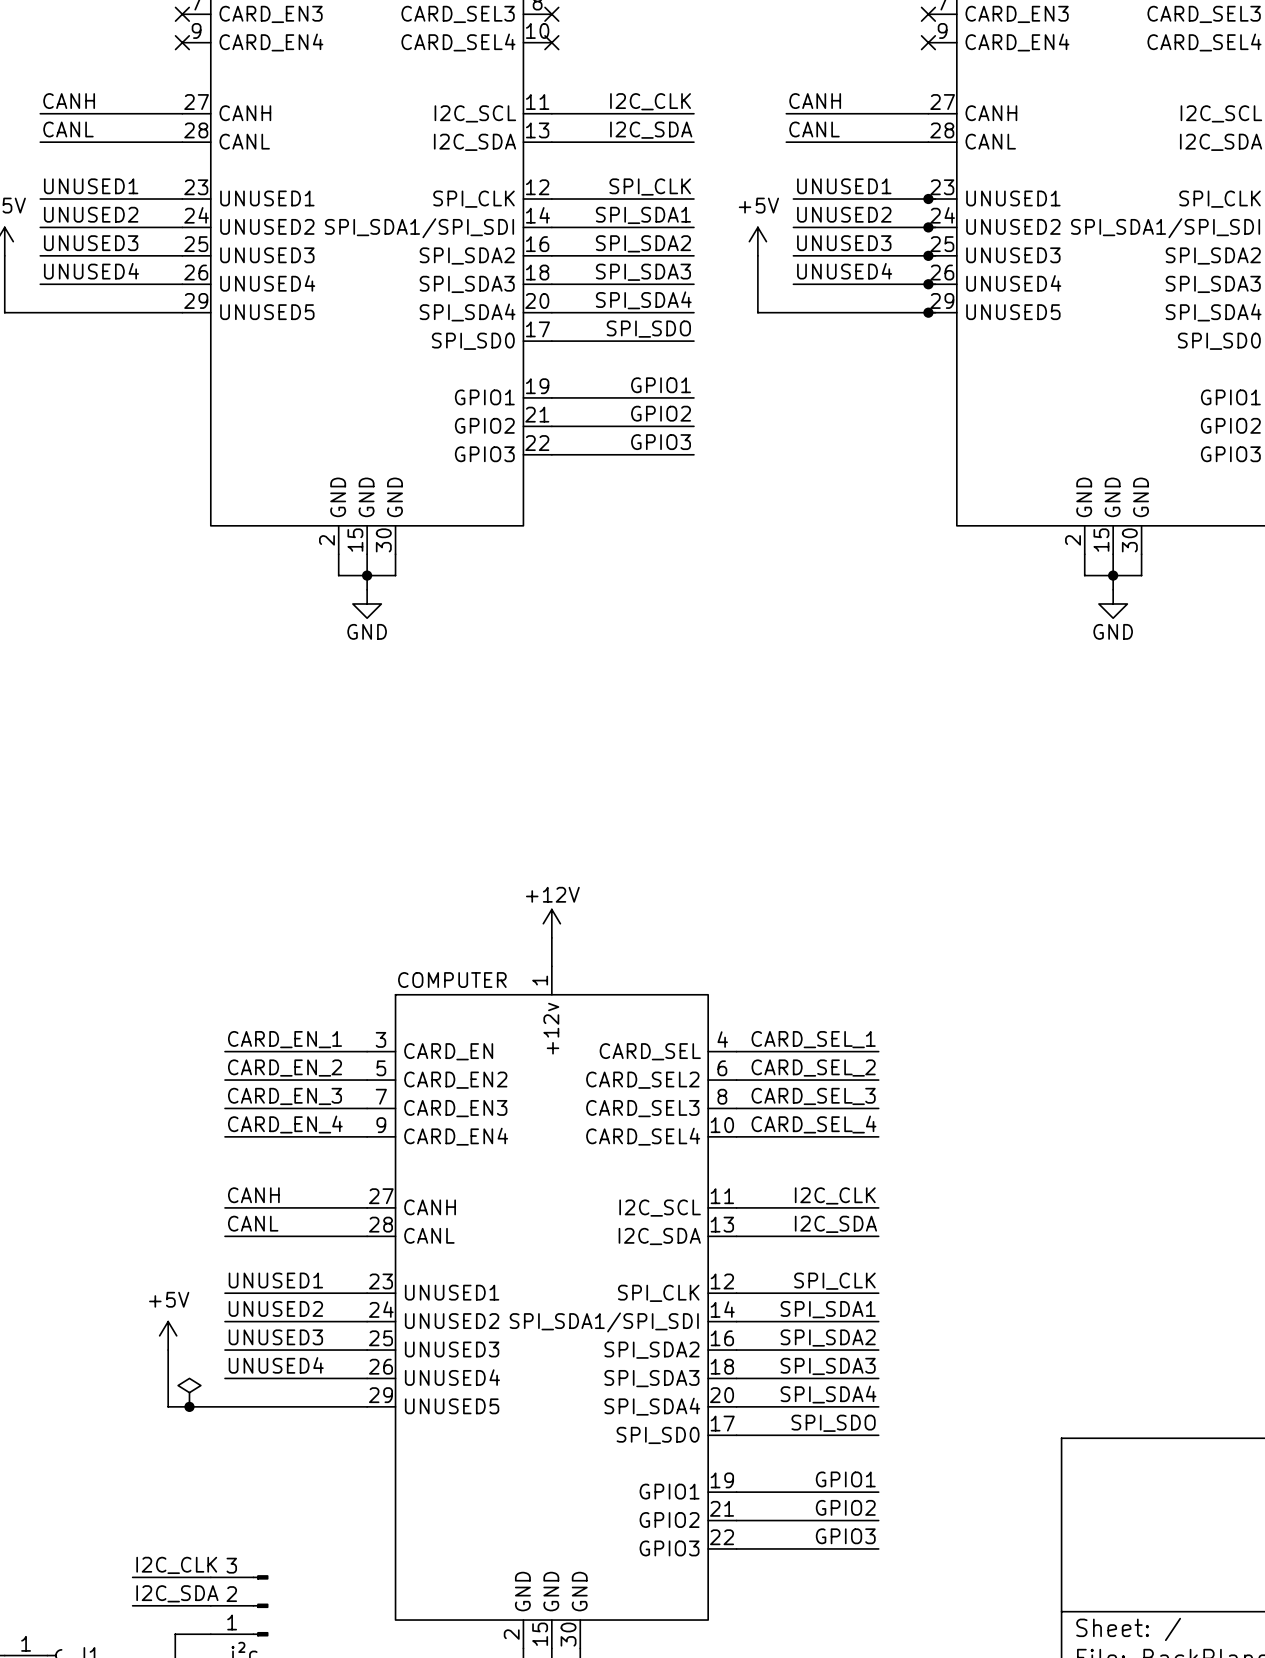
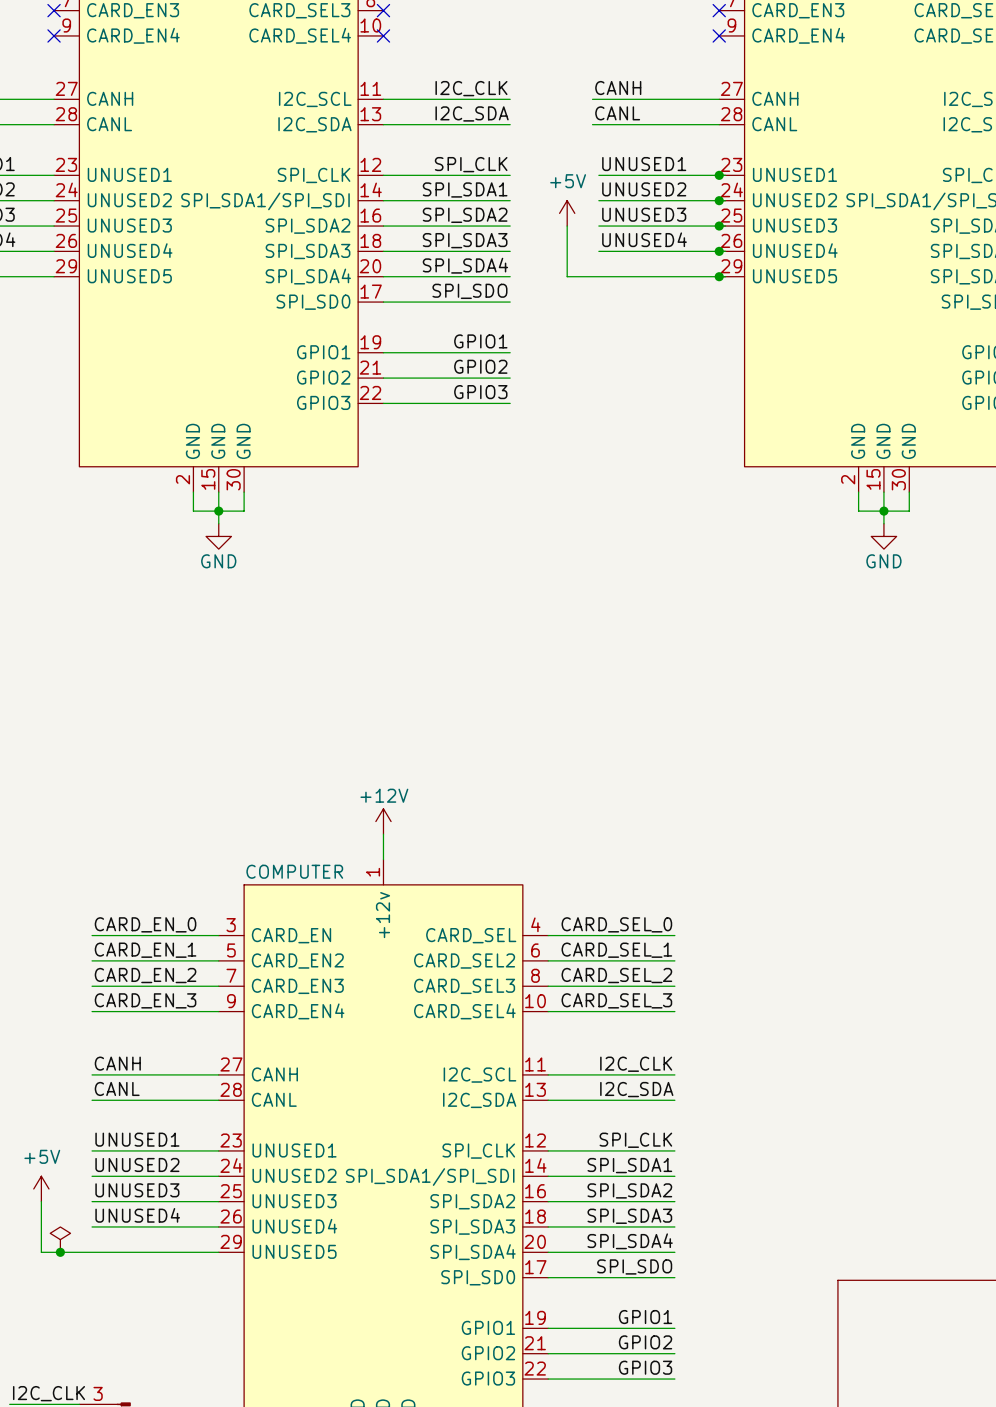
label: CARD_EN_1 (285, 1039) -> CARD_EN_0 (145, 924)
label: CARD_SEL_1 (813, 1039) -> CARD_SEL_0 (616, 924)
label: CARD_EN_2 (285, 1068) -> CARD_EN_1 (145, 950)
label: CARD_SEL_2 (813, 1068) -> CARD_SEL_1 (616, 950)
label: CARD_EN_3 (285, 1096) -> CARD_EN_2 (145, 975)
label: CARD_SEL_3 (813, 1096) -> CARD_SEL_2 (616, 975)
label: CARD_EN_4 (285, 1124) -> CARD_EN_3 (145, 1000)
label: CARD_SEL_4 (813, 1124) -> CARD_SEL_3 (616, 1000)

